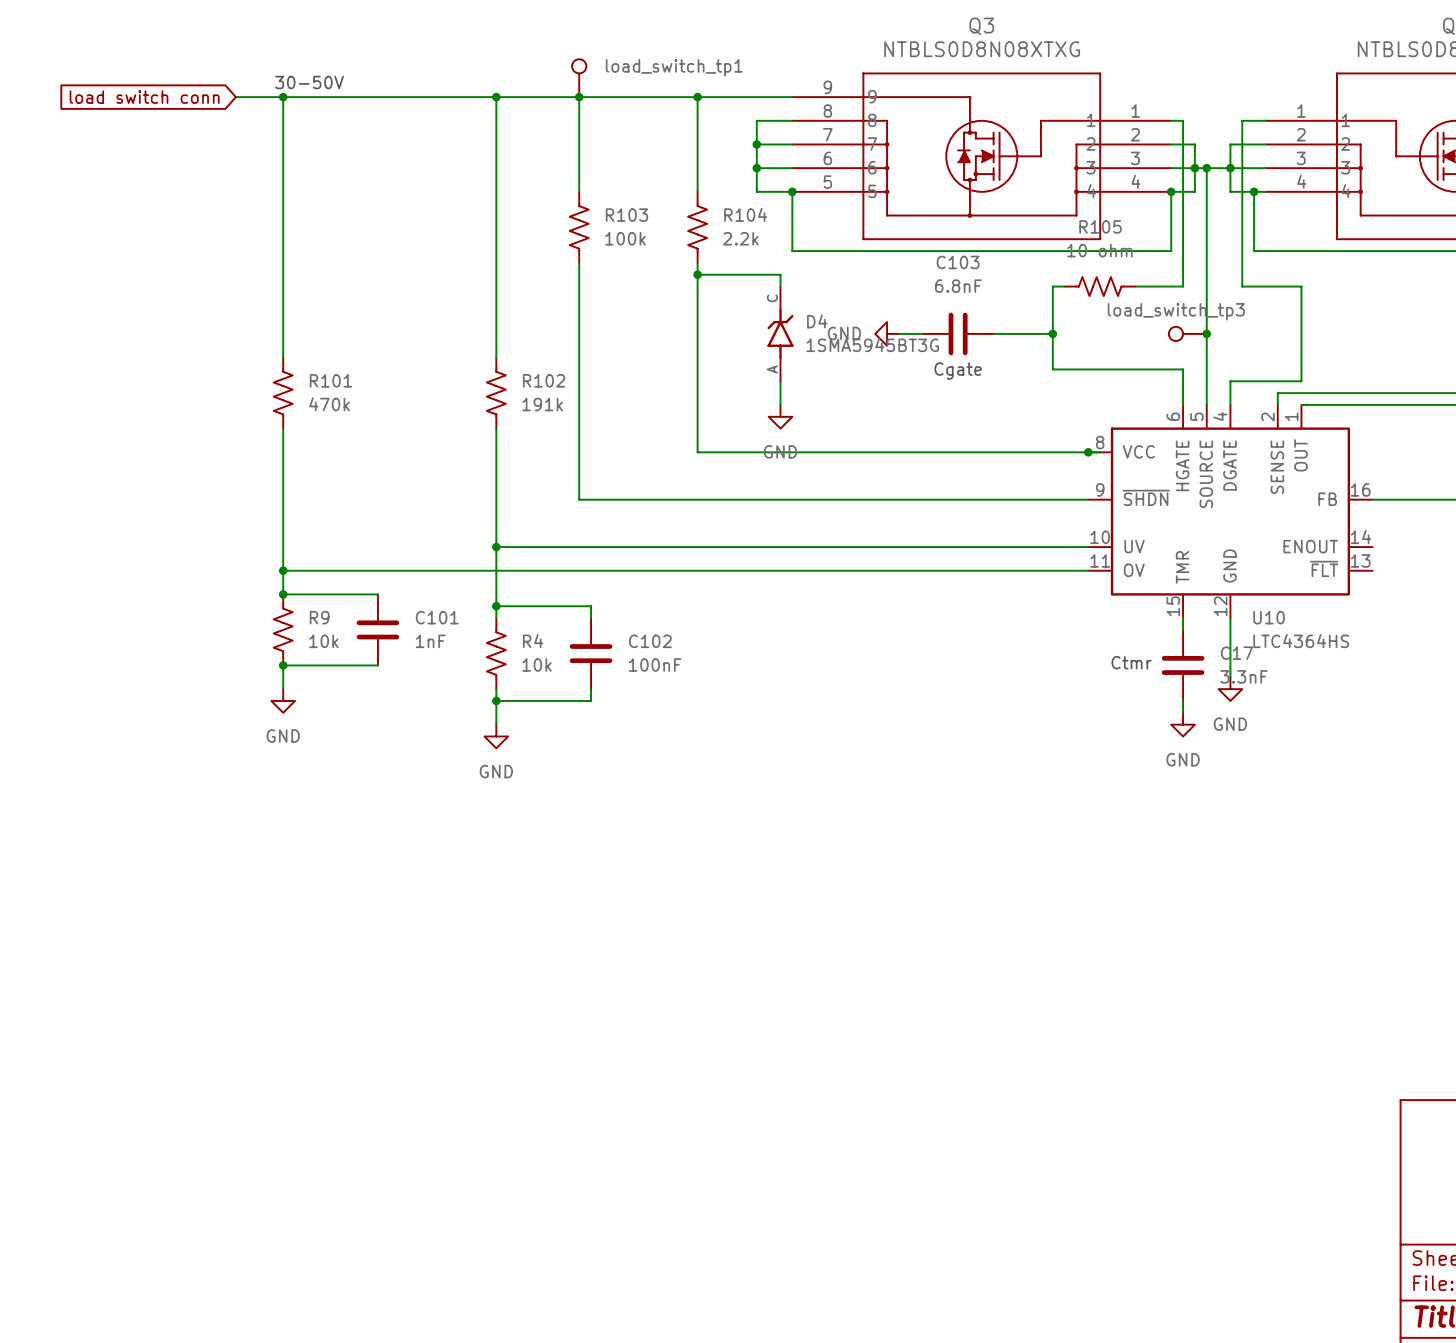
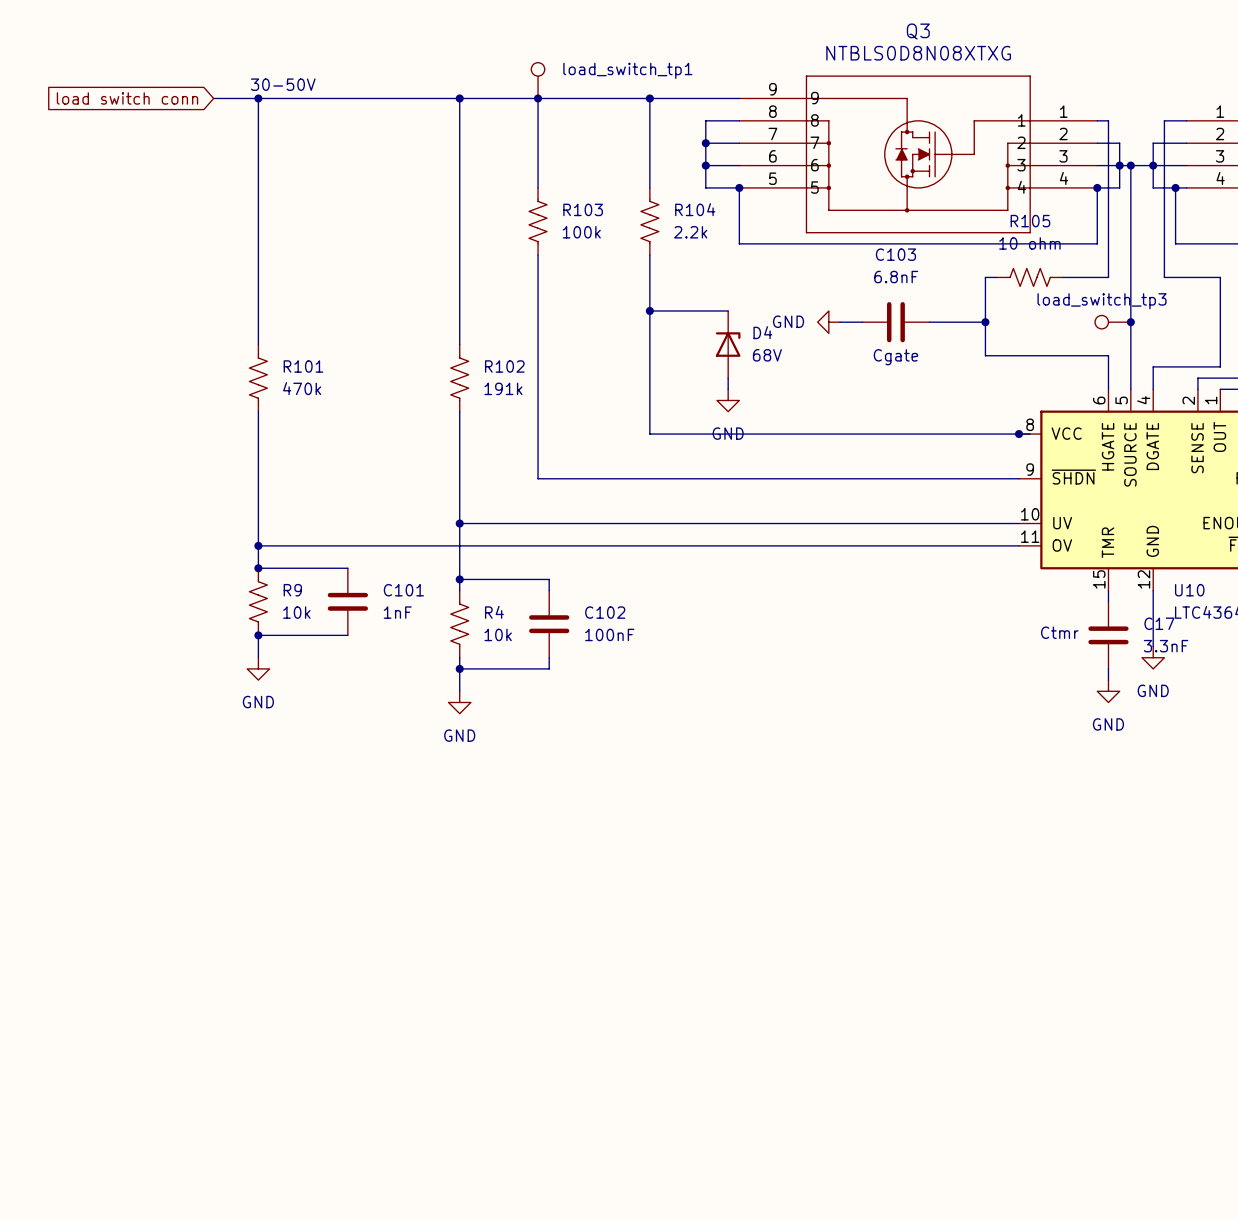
wire: (697, 274) (780, 274) (780, 286) -> none
junction position: (697, 274) -> (649, 310)
D4 symbol: [767, 286, 794, 382] -> [715, 310, 741, 379]
wire: none -> (649, 310) (728, 310)
D4 value: 1SMA5945BT3G (872, 345) -> 68V (767, 355)

